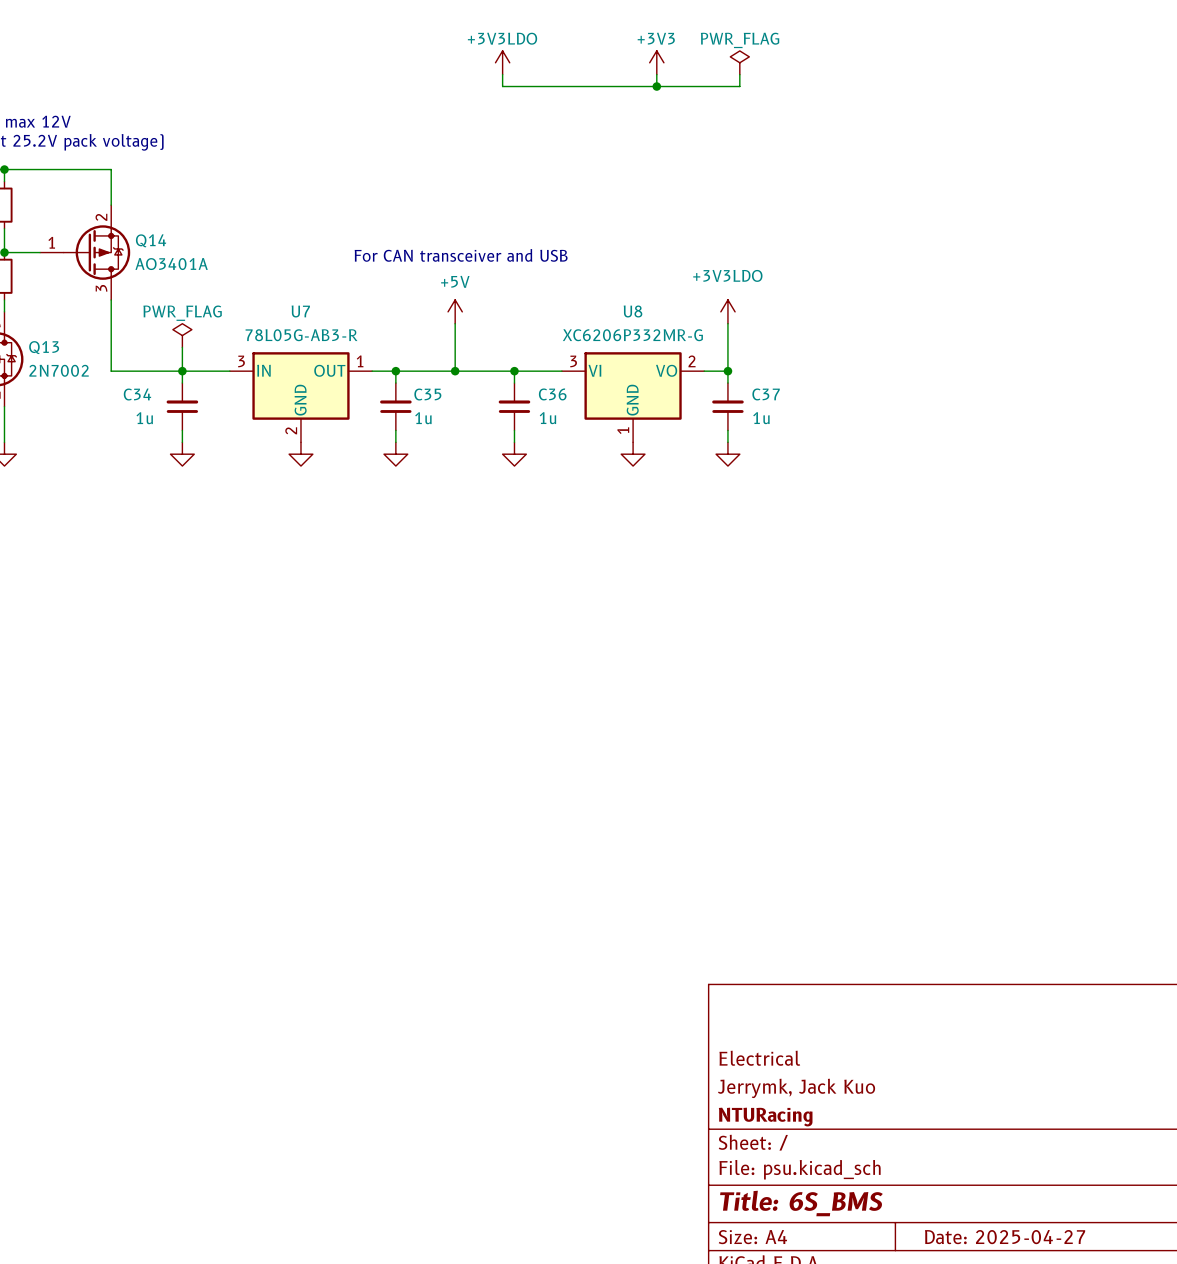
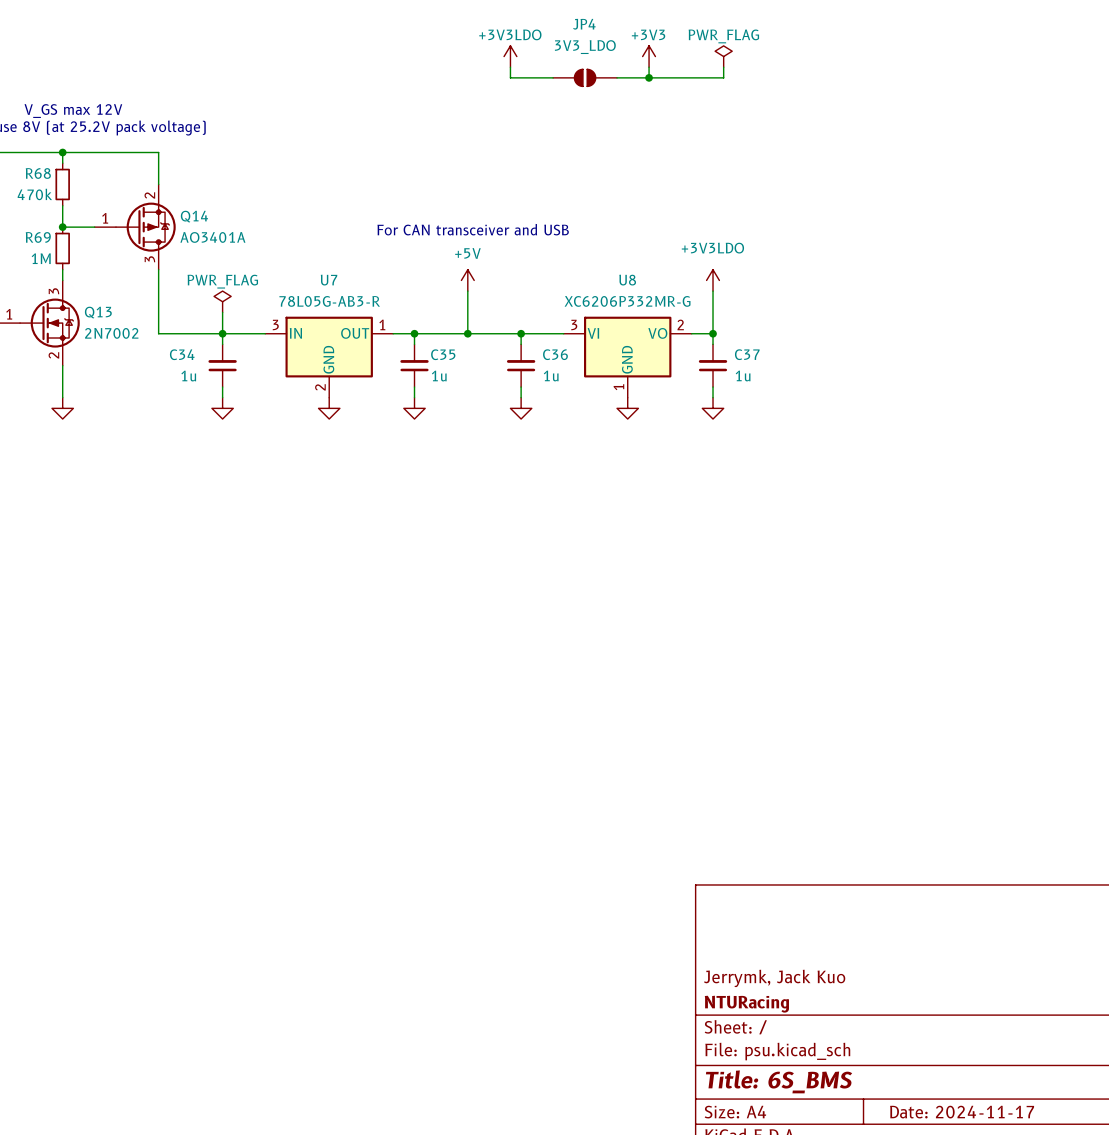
JP4: none -> 3V3_LDO (585, 77)
title block: Electrical (759, 1058) -> none
title block: Date: 2025-04-27 (1005, 1237) -> Date: 2024-11-17 (962, 1112)

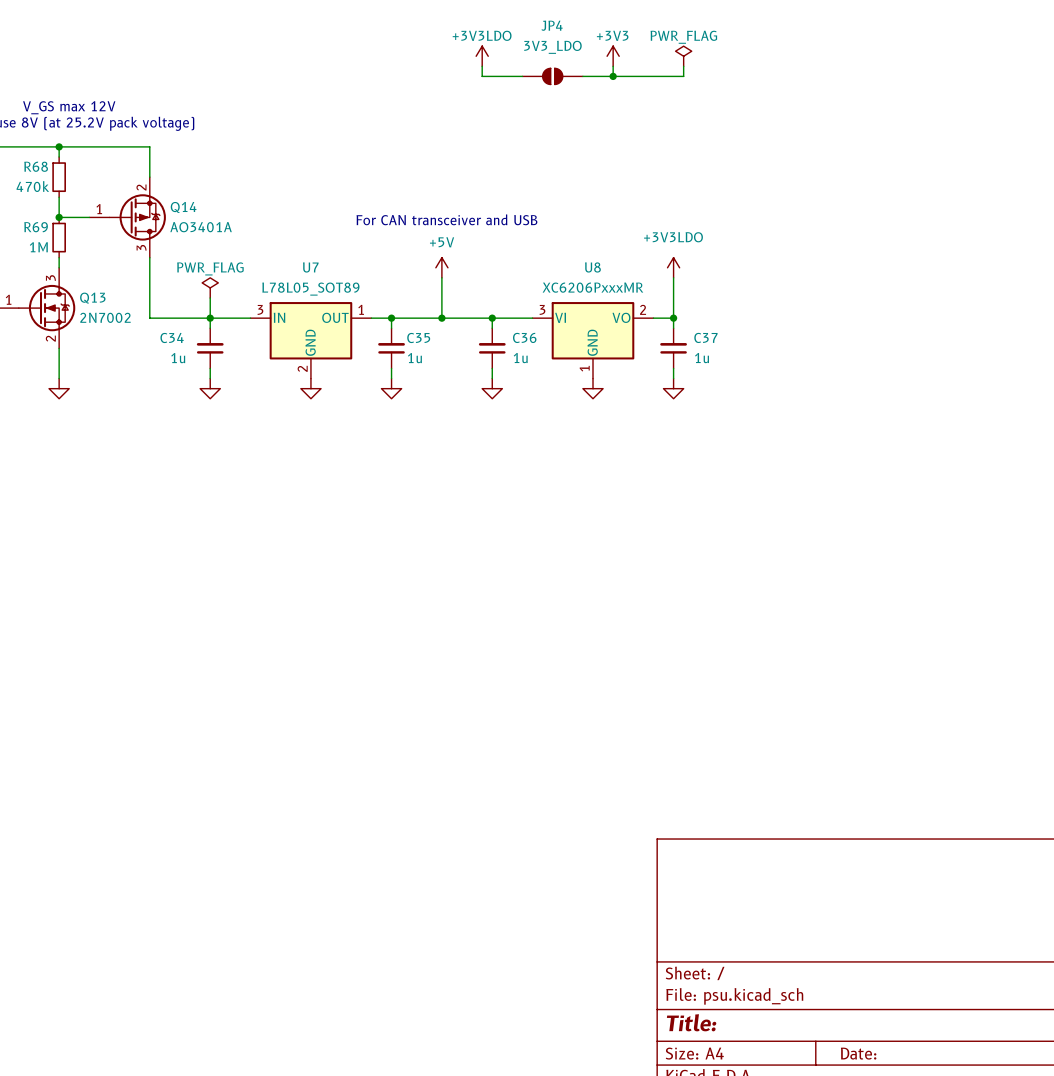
U7 value: 78L05G-AB3-R (329, 301) -> L78L05_SOT89 (310, 289)
U8 value: XC6206P332MR-G (627, 301) -> XC6206PxxxMR (592, 287)
title block: Jerrymk, Jack Kuo (774, 978) -> none
title block: NTURacing (746, 1004) -> none
title block: Title: 6S_BMS (779, 1081) -> Title: (691, 1022)
title block: Date: 2024-11-17 (962, 1112) -> Date: (858, 1053)

